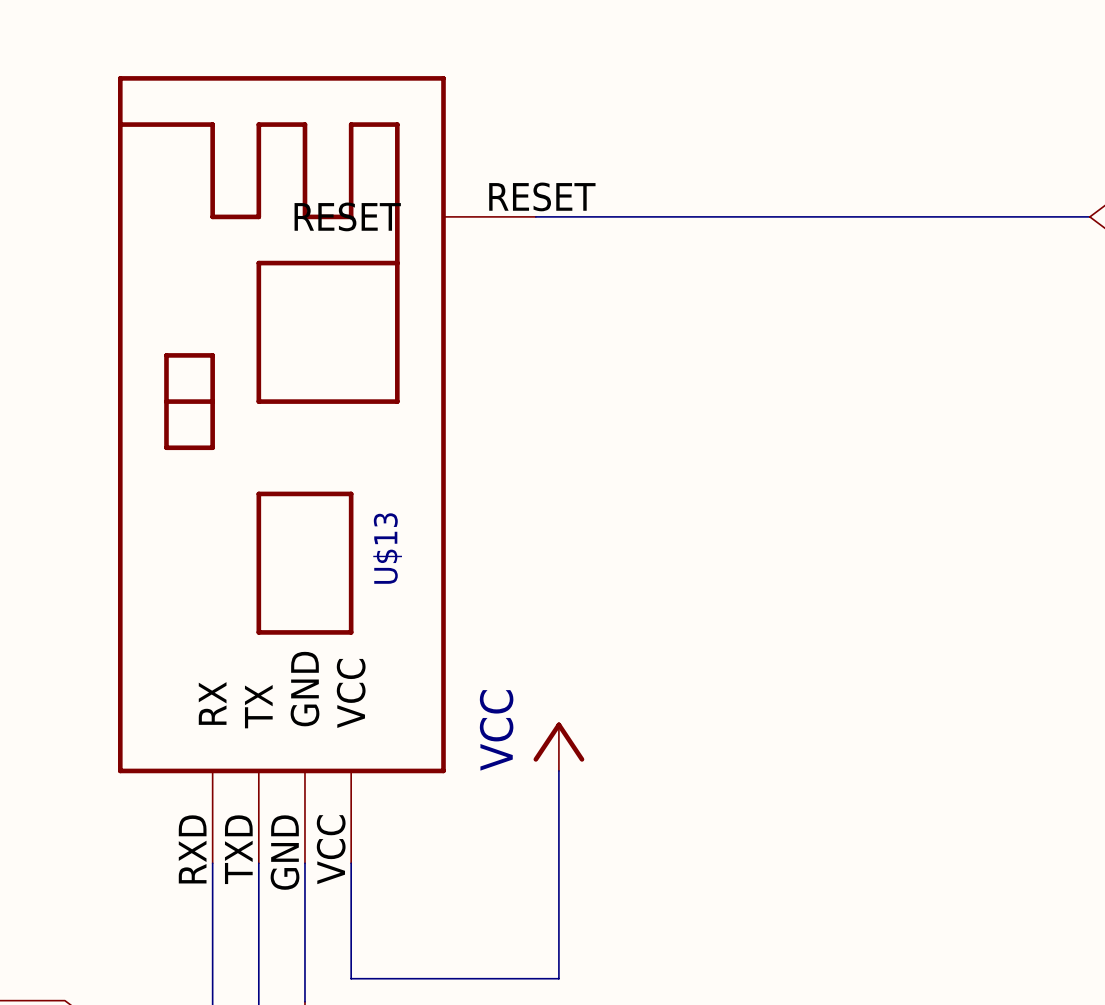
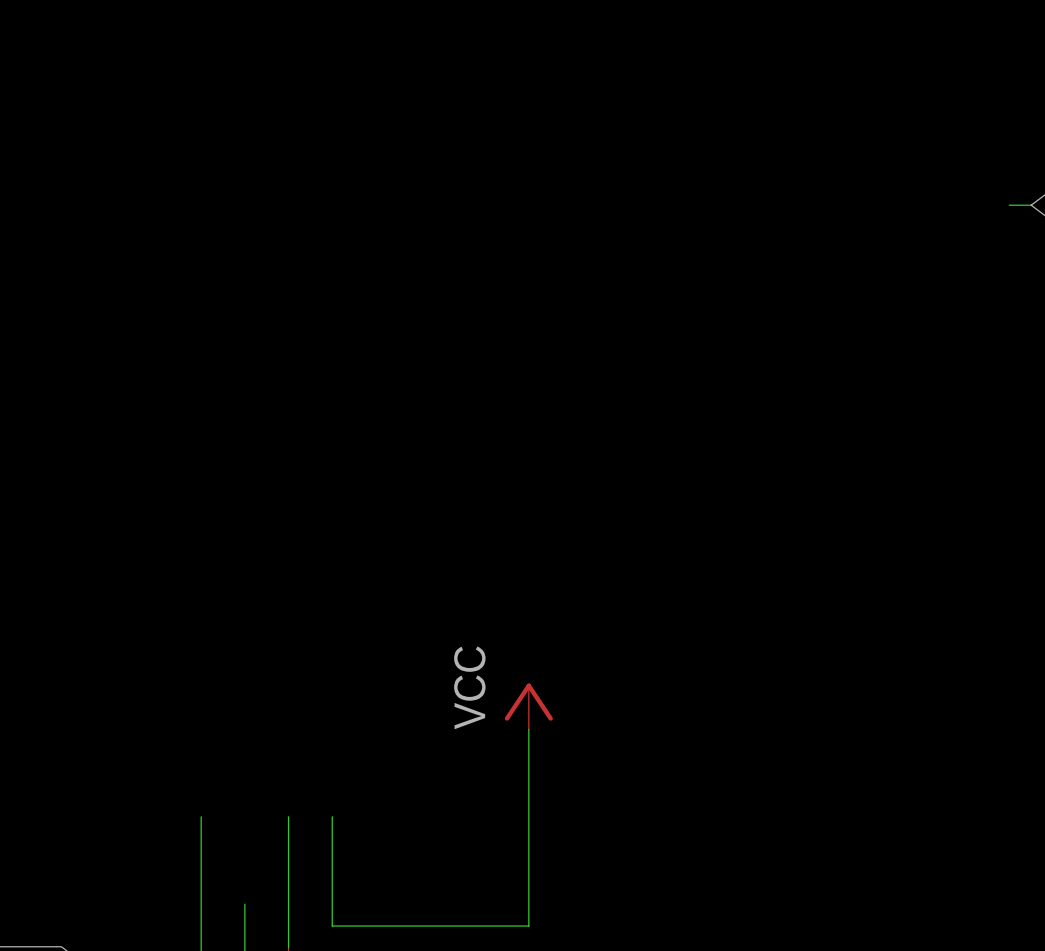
wire: (535, 216) (1066, 216) -> none
U$13: (326, 469) -> none
wire: (258, 863) (258, 955) -> none

